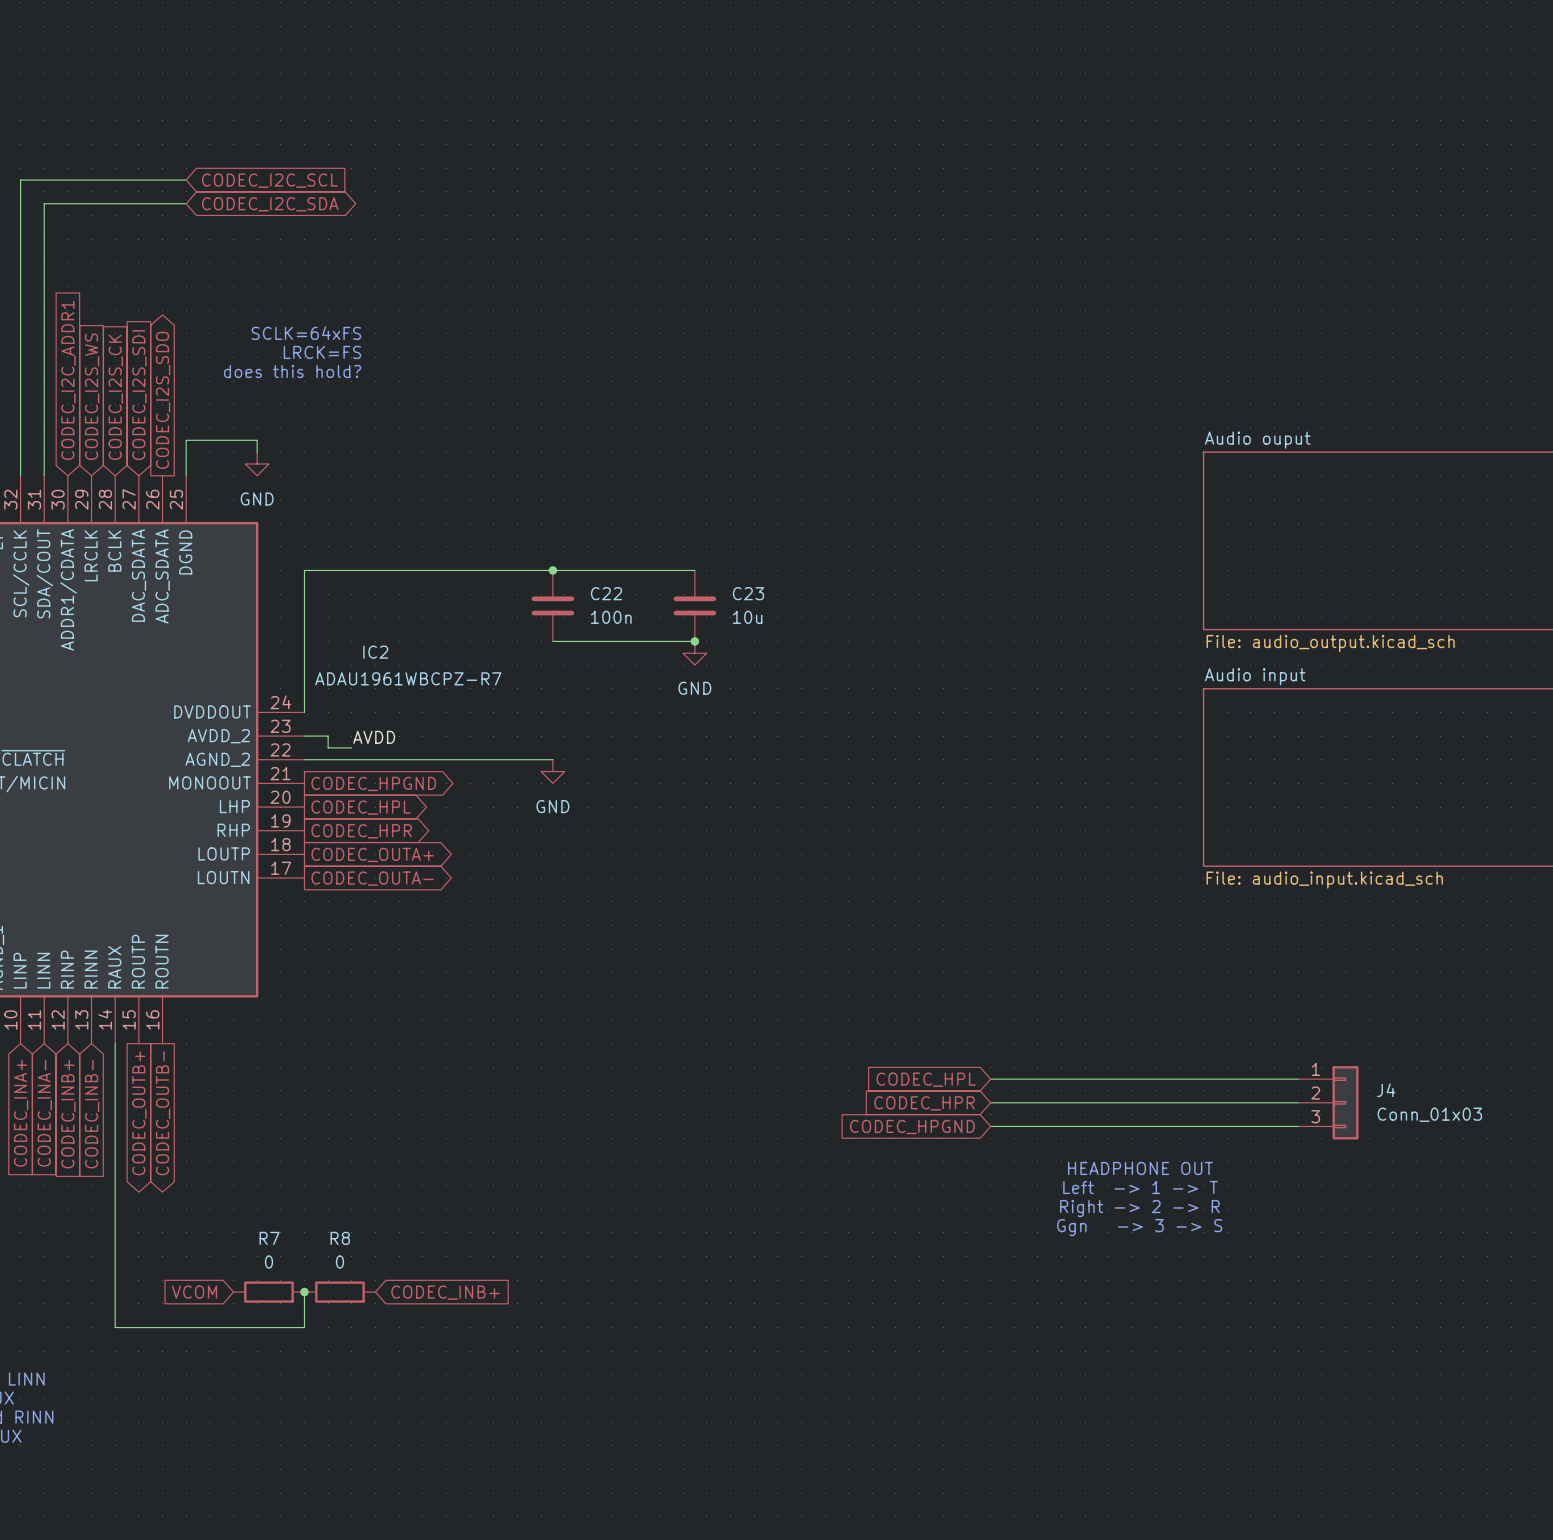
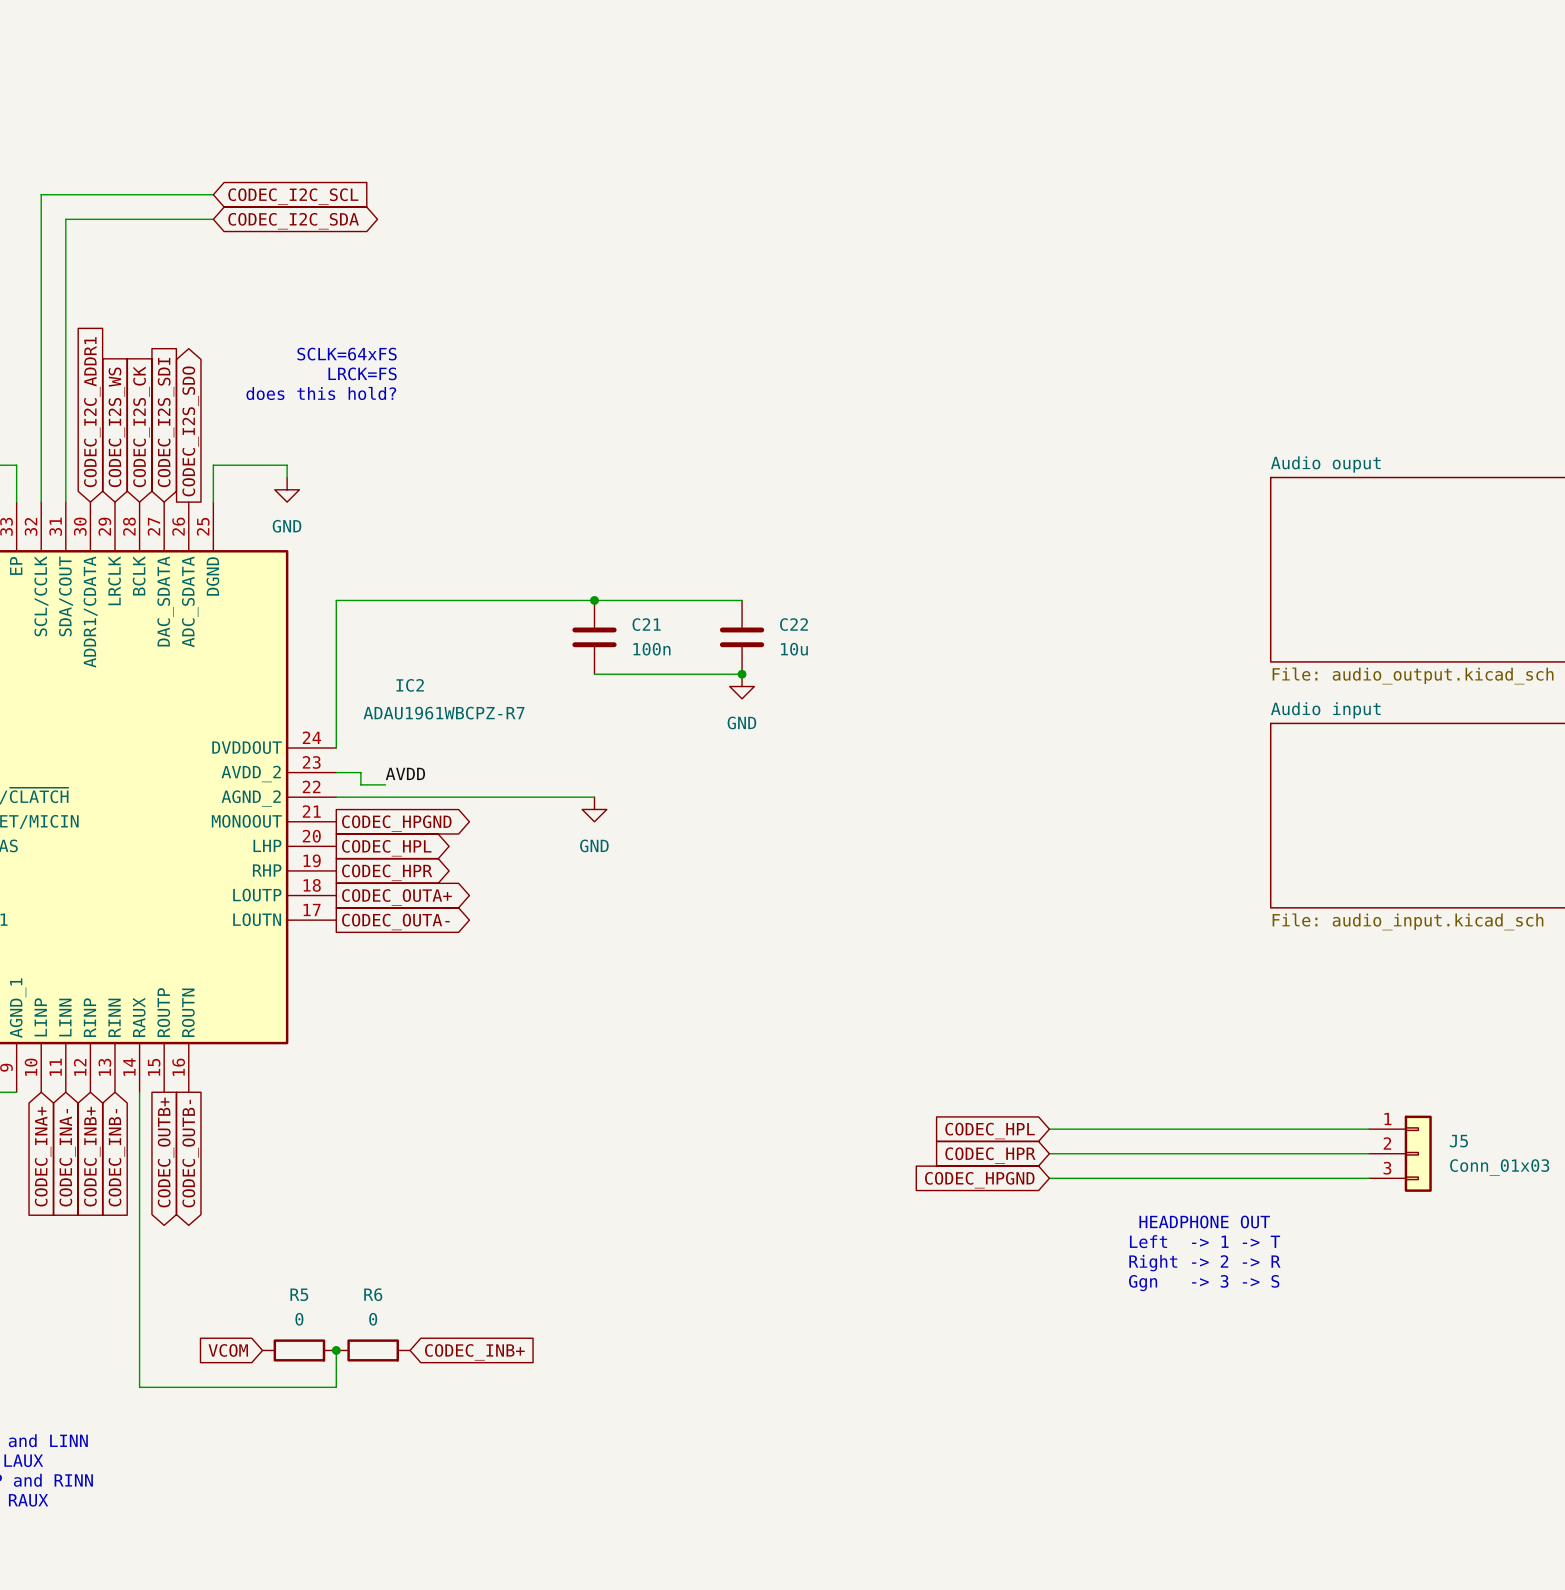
C22 name: C22 (606, 593) -> C21 (646, 624)
C23 name: C23 (748, 593) -> C22 (794, 624)
J4 name: J4 (1386, 1090) -> J5 (1458, 1141)
R7 name: R7 (269, 1238) -> R5 (299, 1294)
R8 name: R8 (340, 1238) -> R6 (373, 1294)

